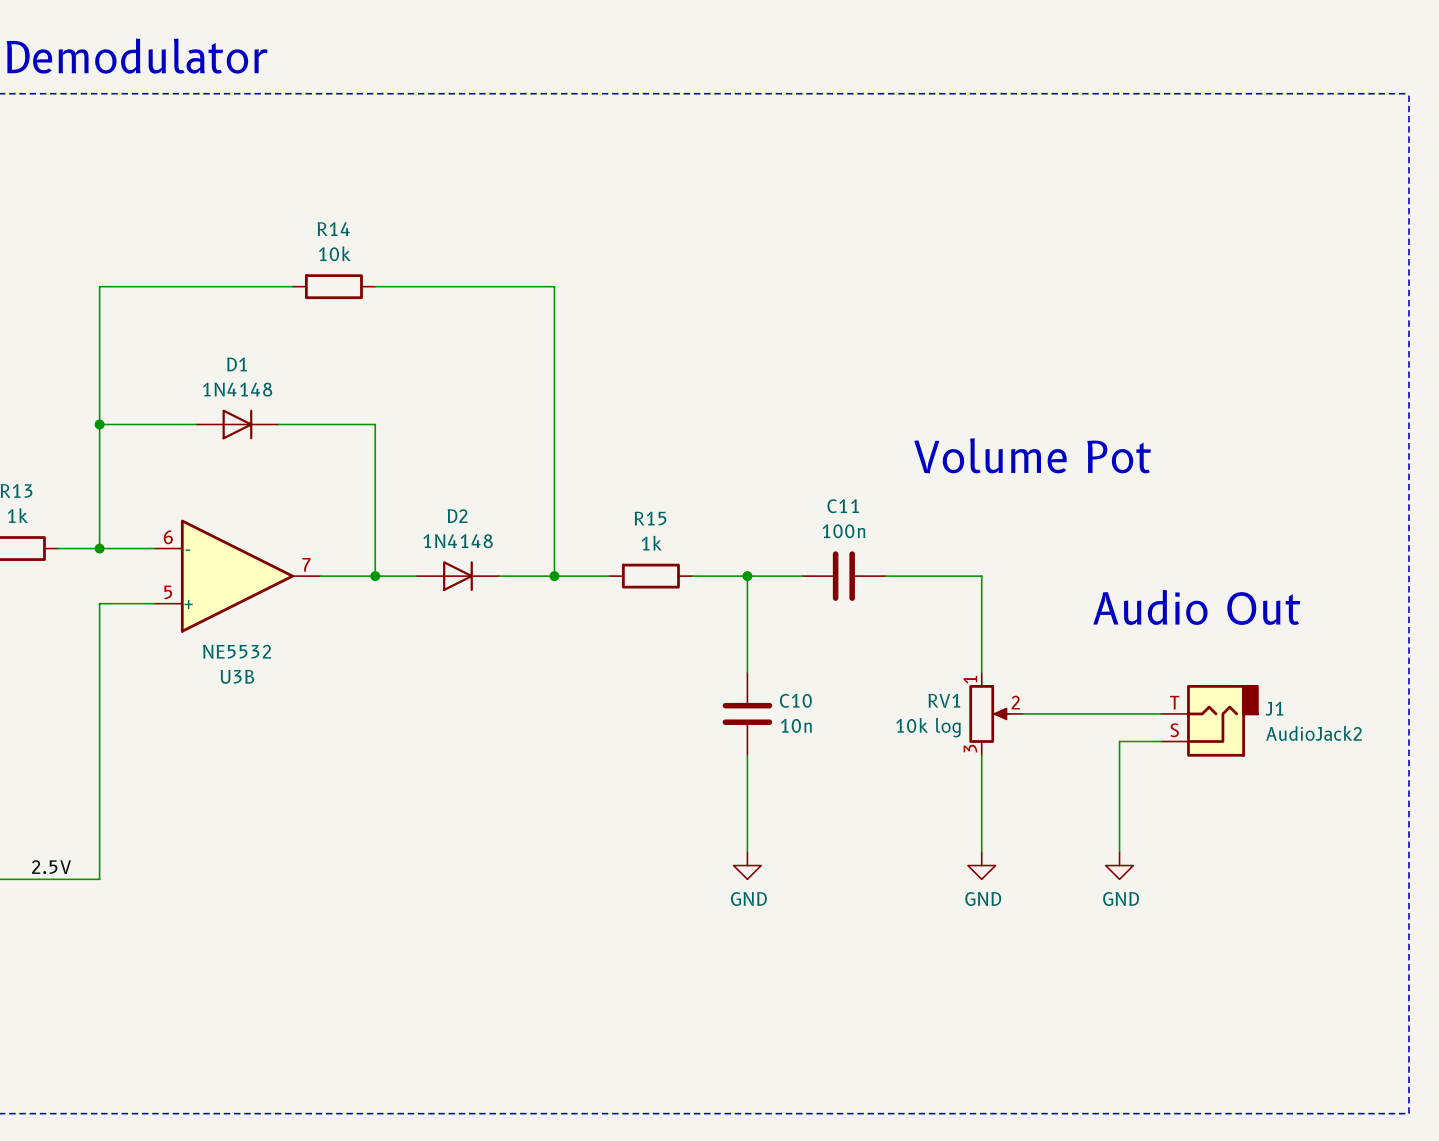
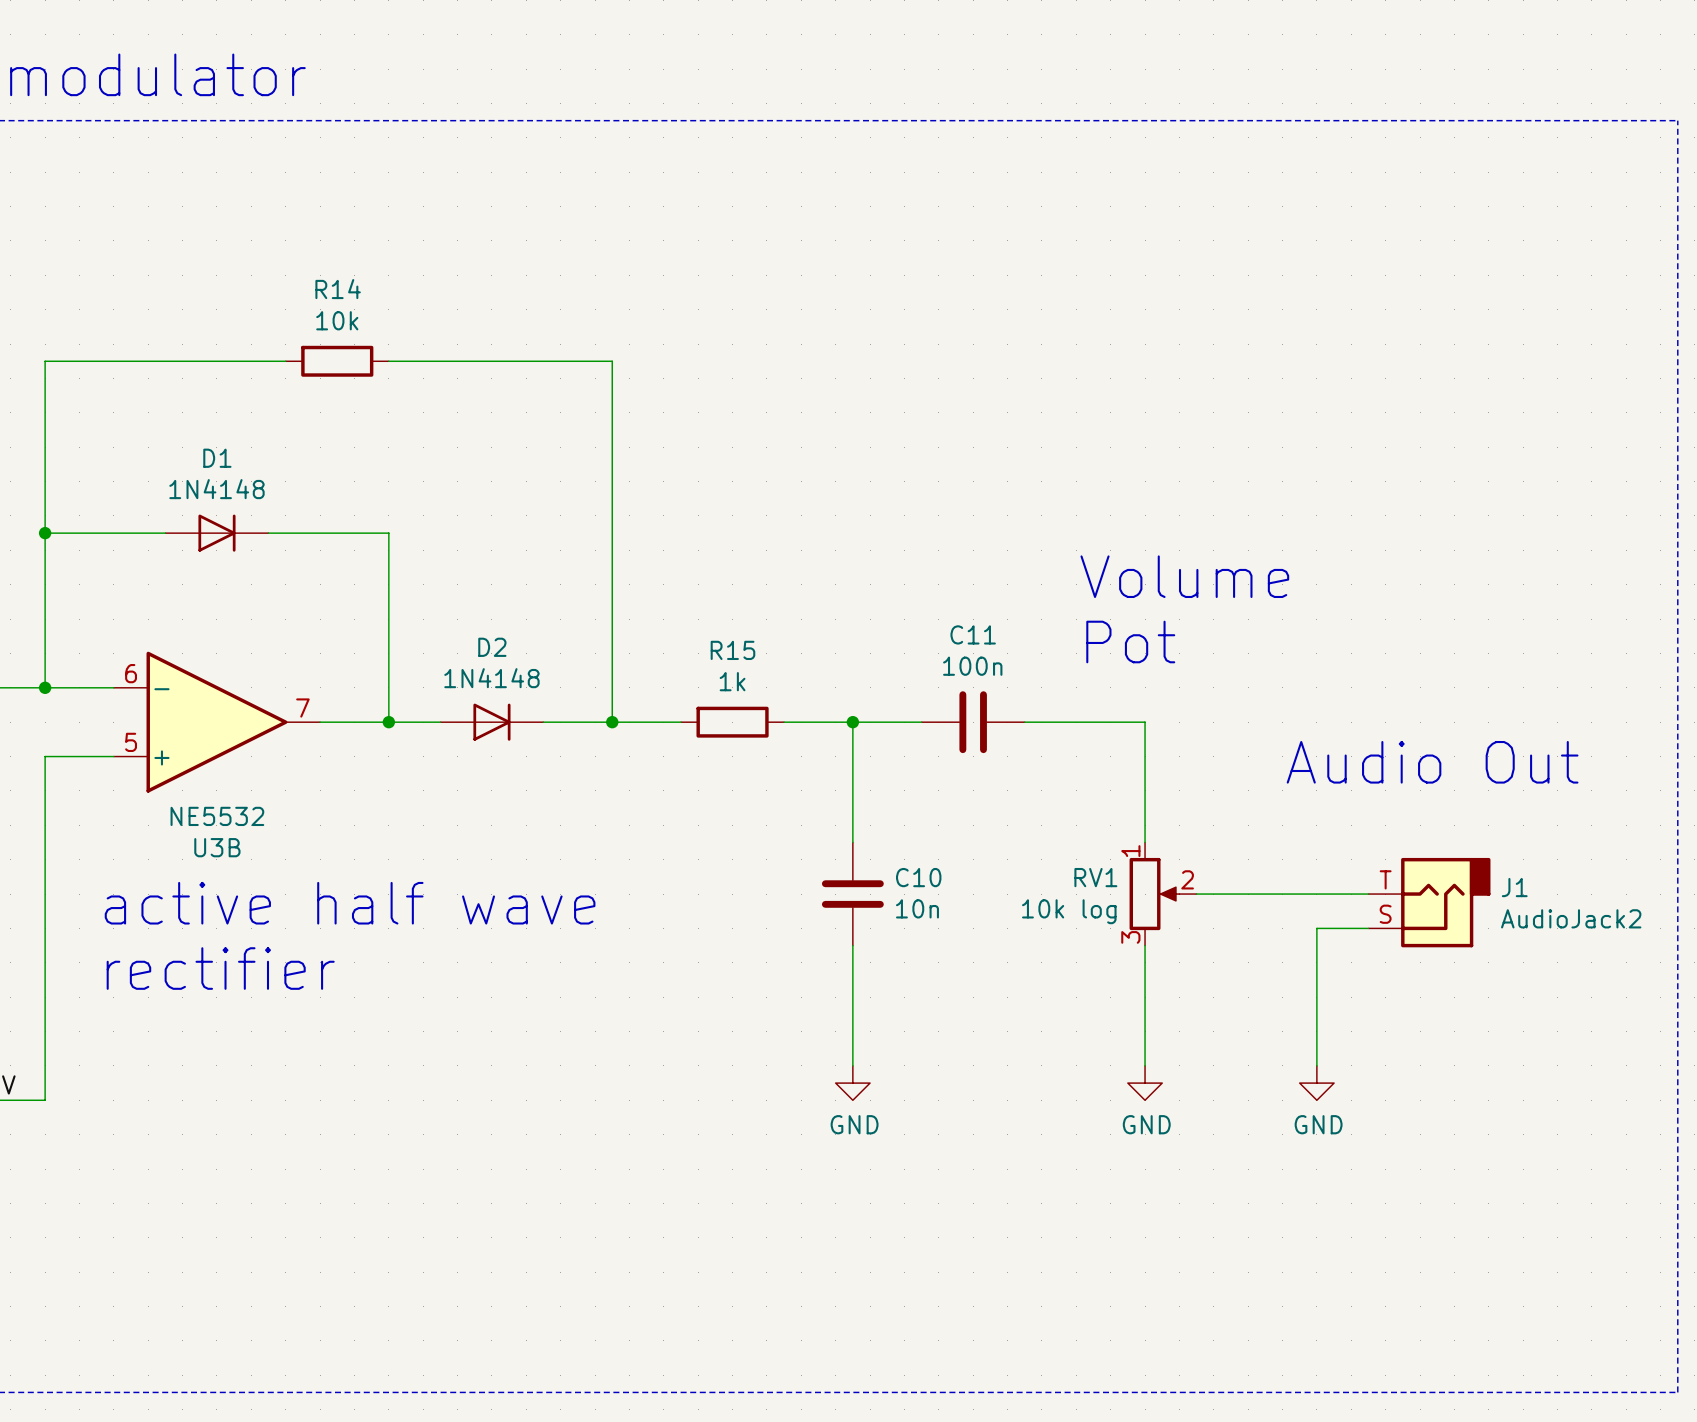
text: Volume Pot (1032, 455) -> Volume (1184, 576)
text: none -> Pot (1130, 641)
text: none -> active half wave (350, 903)
text: none -> rectifier (220, 968)

